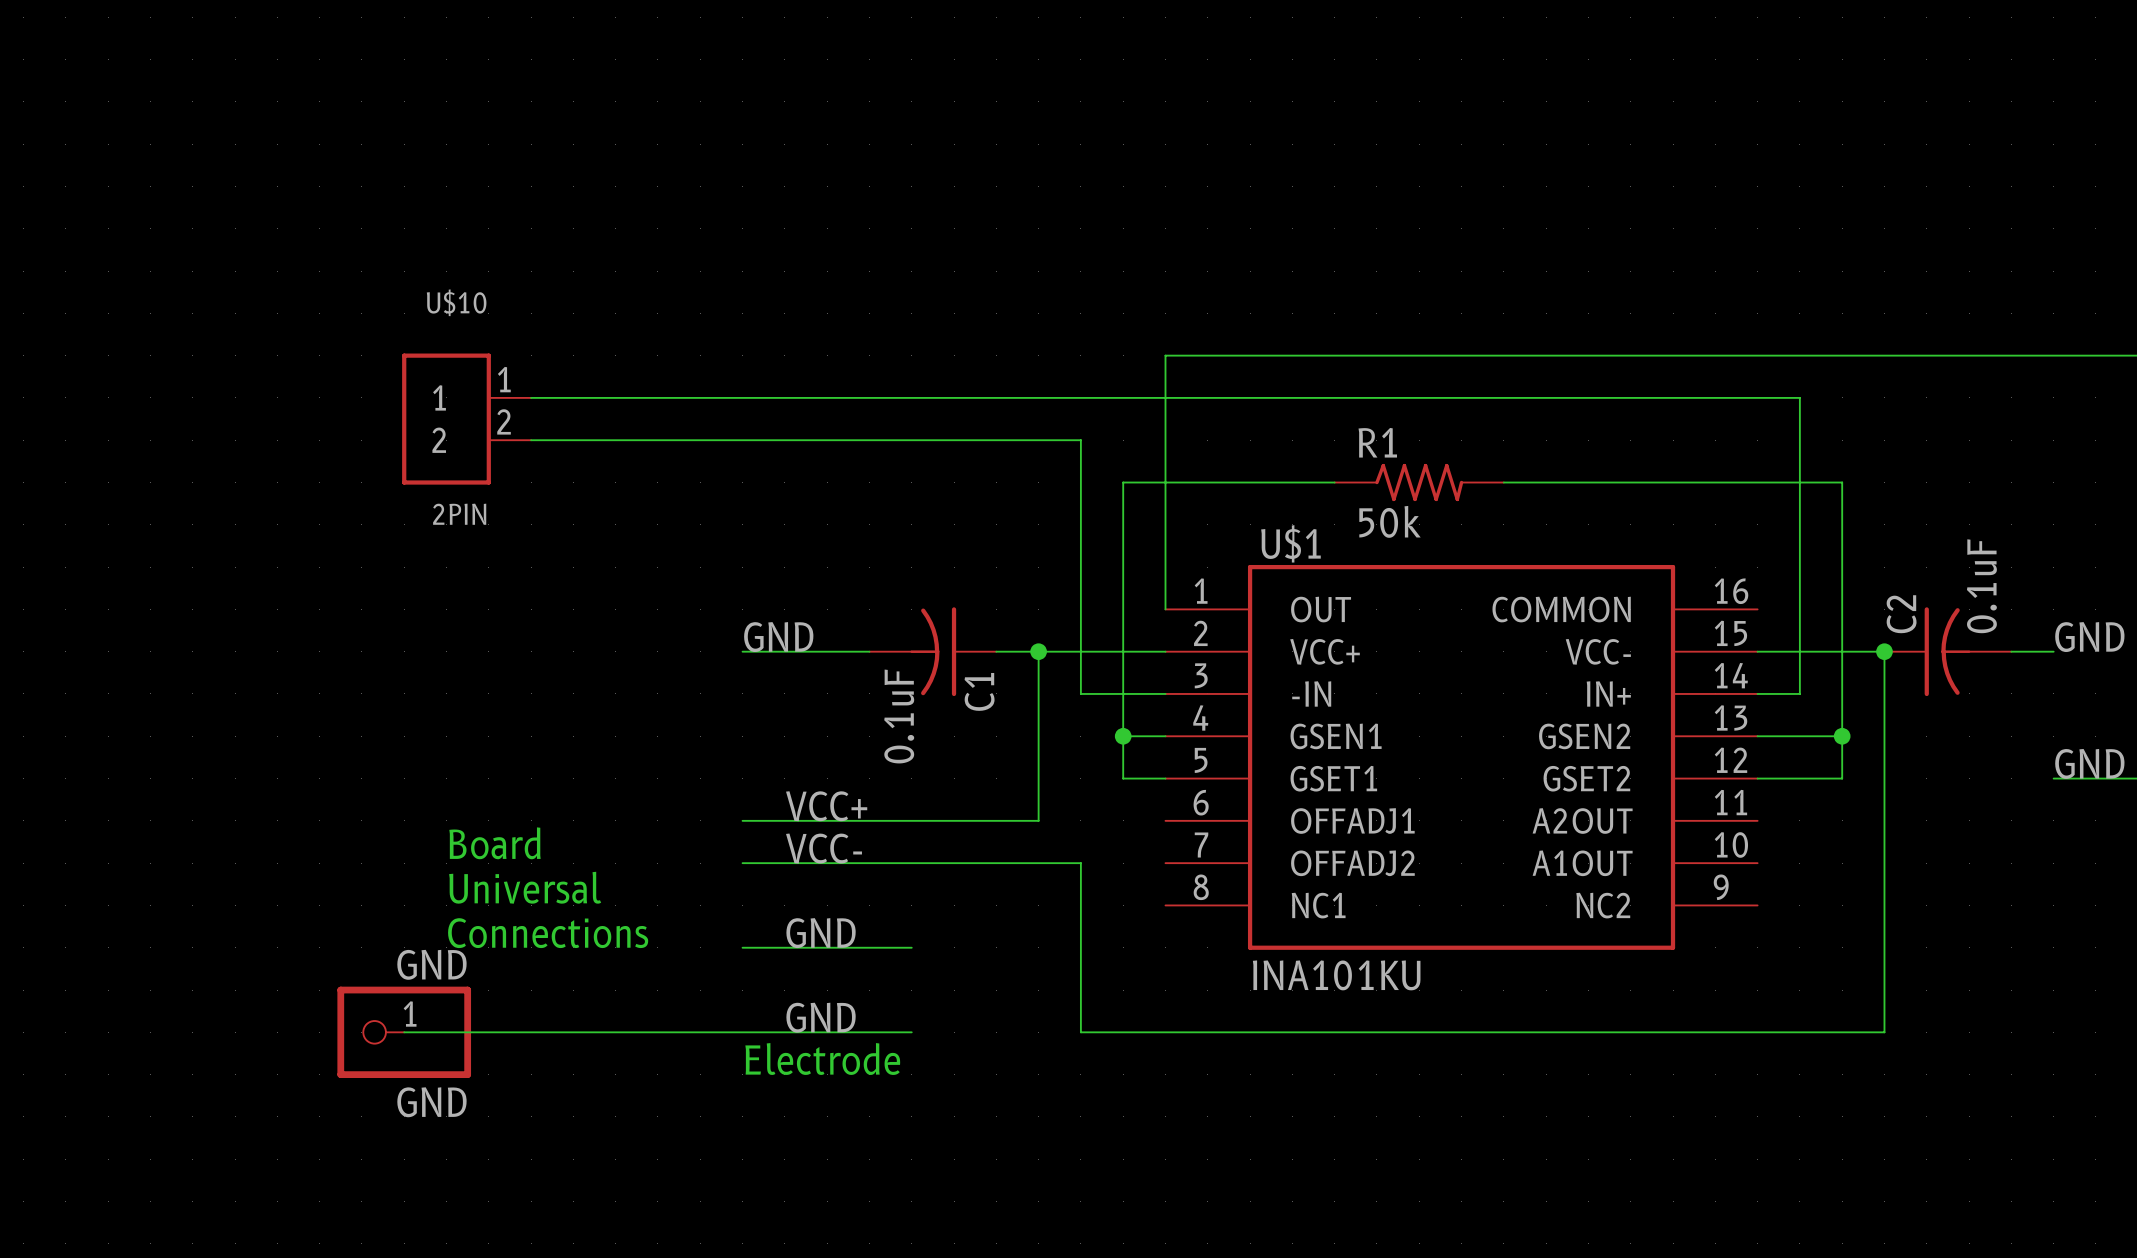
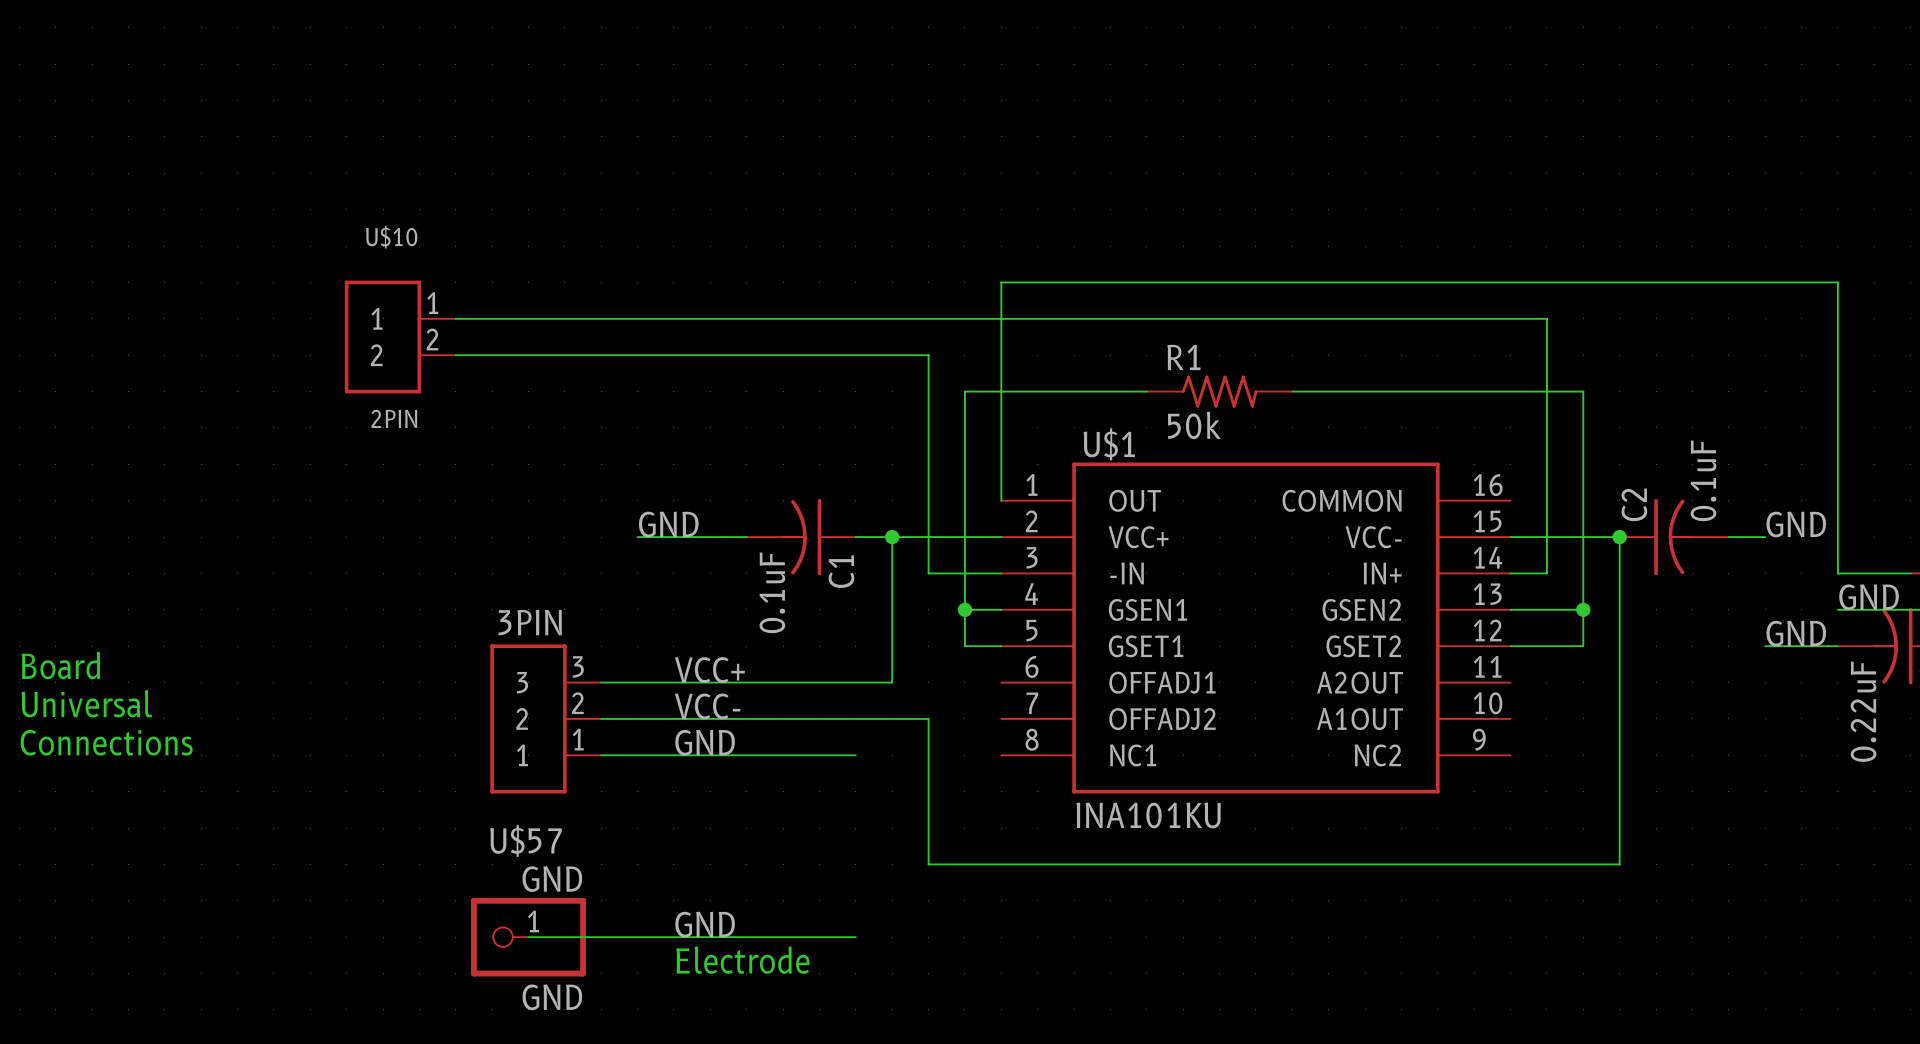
text: none -> Board (60, 665)
wire: none -> (601, 682) (637, 682)
text: Board (494, 843) -> none
text: none -> Universal (86, 703)
U$57: none -> 3PIN (545, 718)
wire: none -> (601, 718) (637, 718)
text: Universal (525, 887) -> none
text: none -> Connections (106, 742)
wire: none -> (601, 755) (855, 755)
text: Connections (548, 933) -> none
label position: GND (821, 933) -> GND (705, 742)
wire: (742, 947) (911, 947) -> none
label: GND (821, 1017) -> none
wire: (404, 1032) (911, 1032) -> none
GND position: (404, 1032) -> (528, 937)
text position: Electrode (822, 1059) -> Electrode (742, 960)
label: none -> GND (705, 924)
wire: none -> (528, 937) (855, 937)

